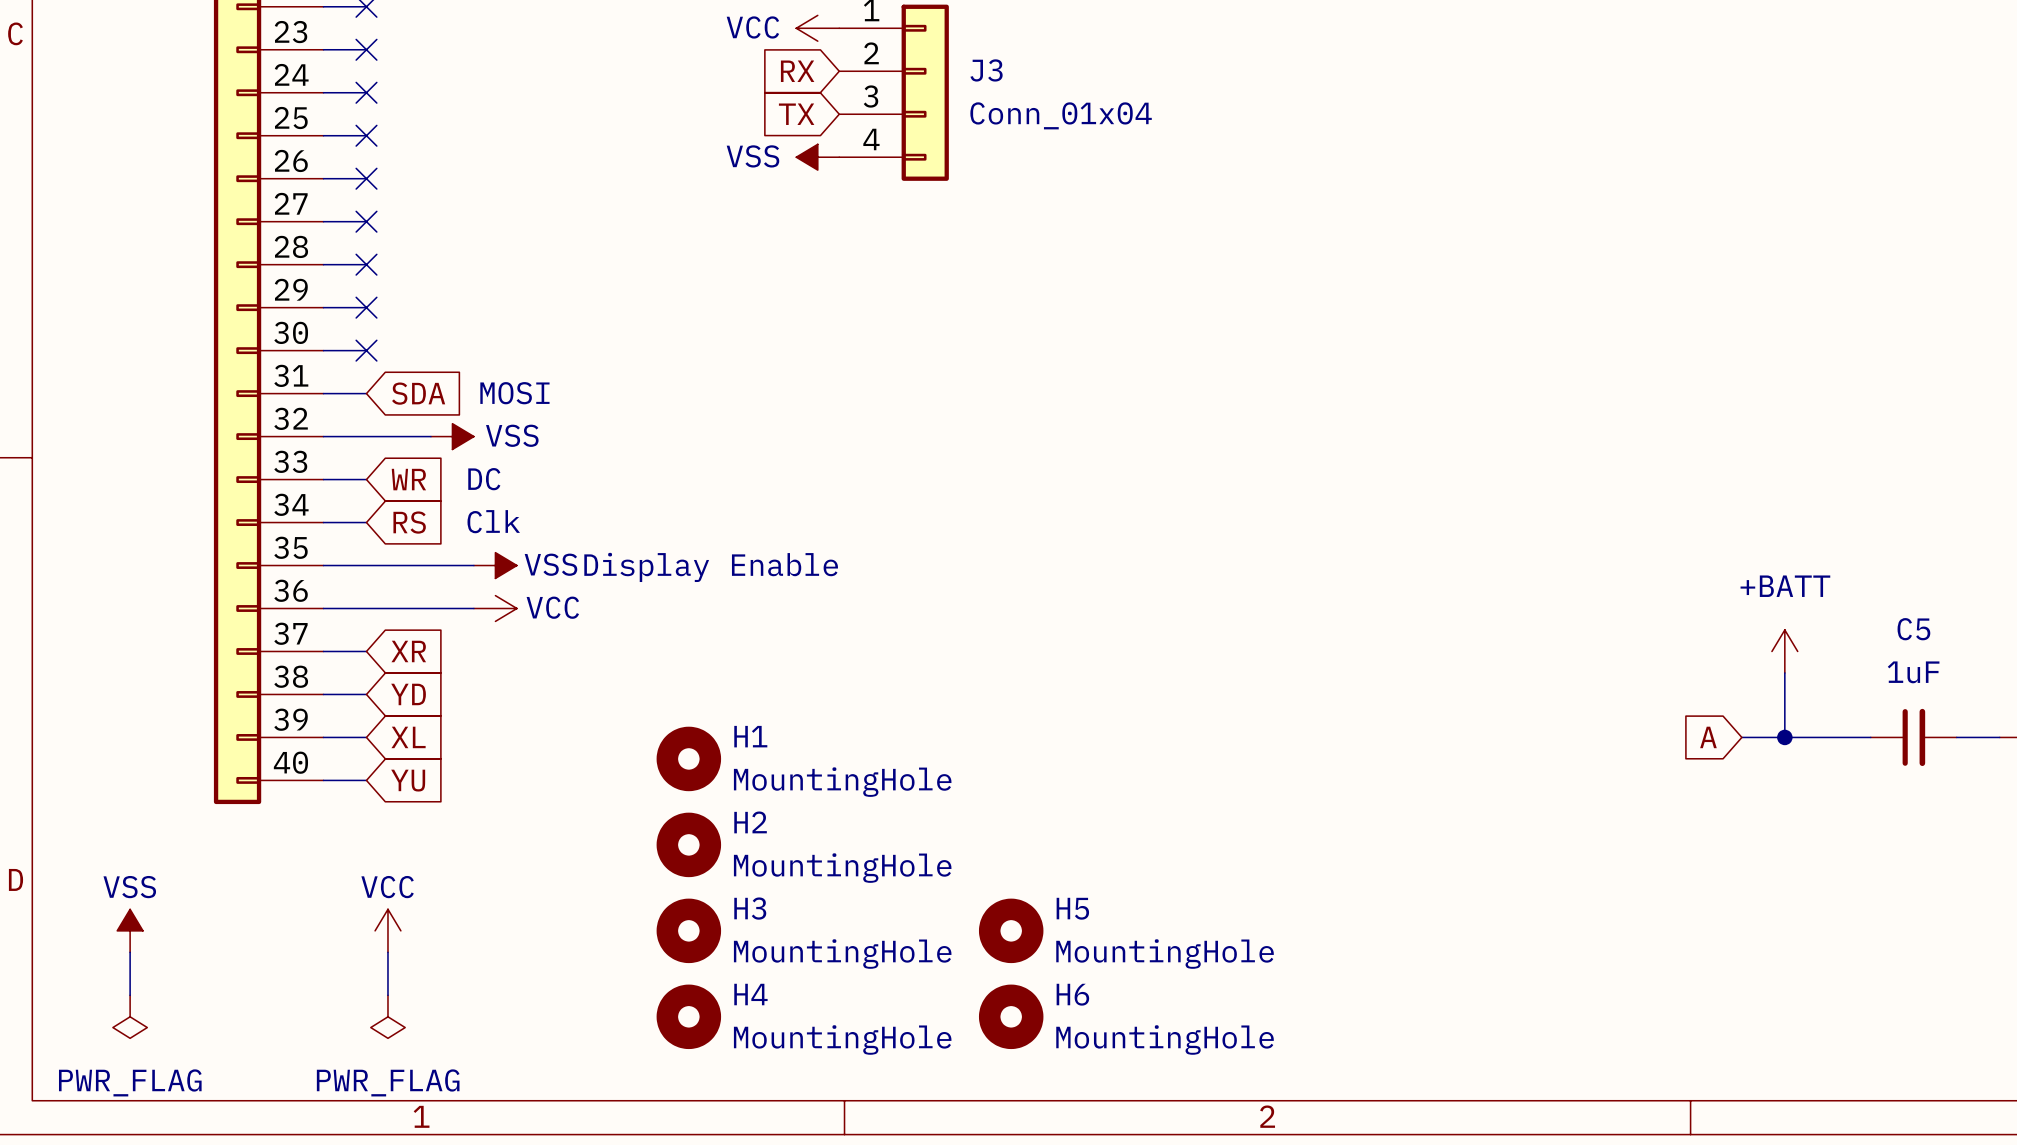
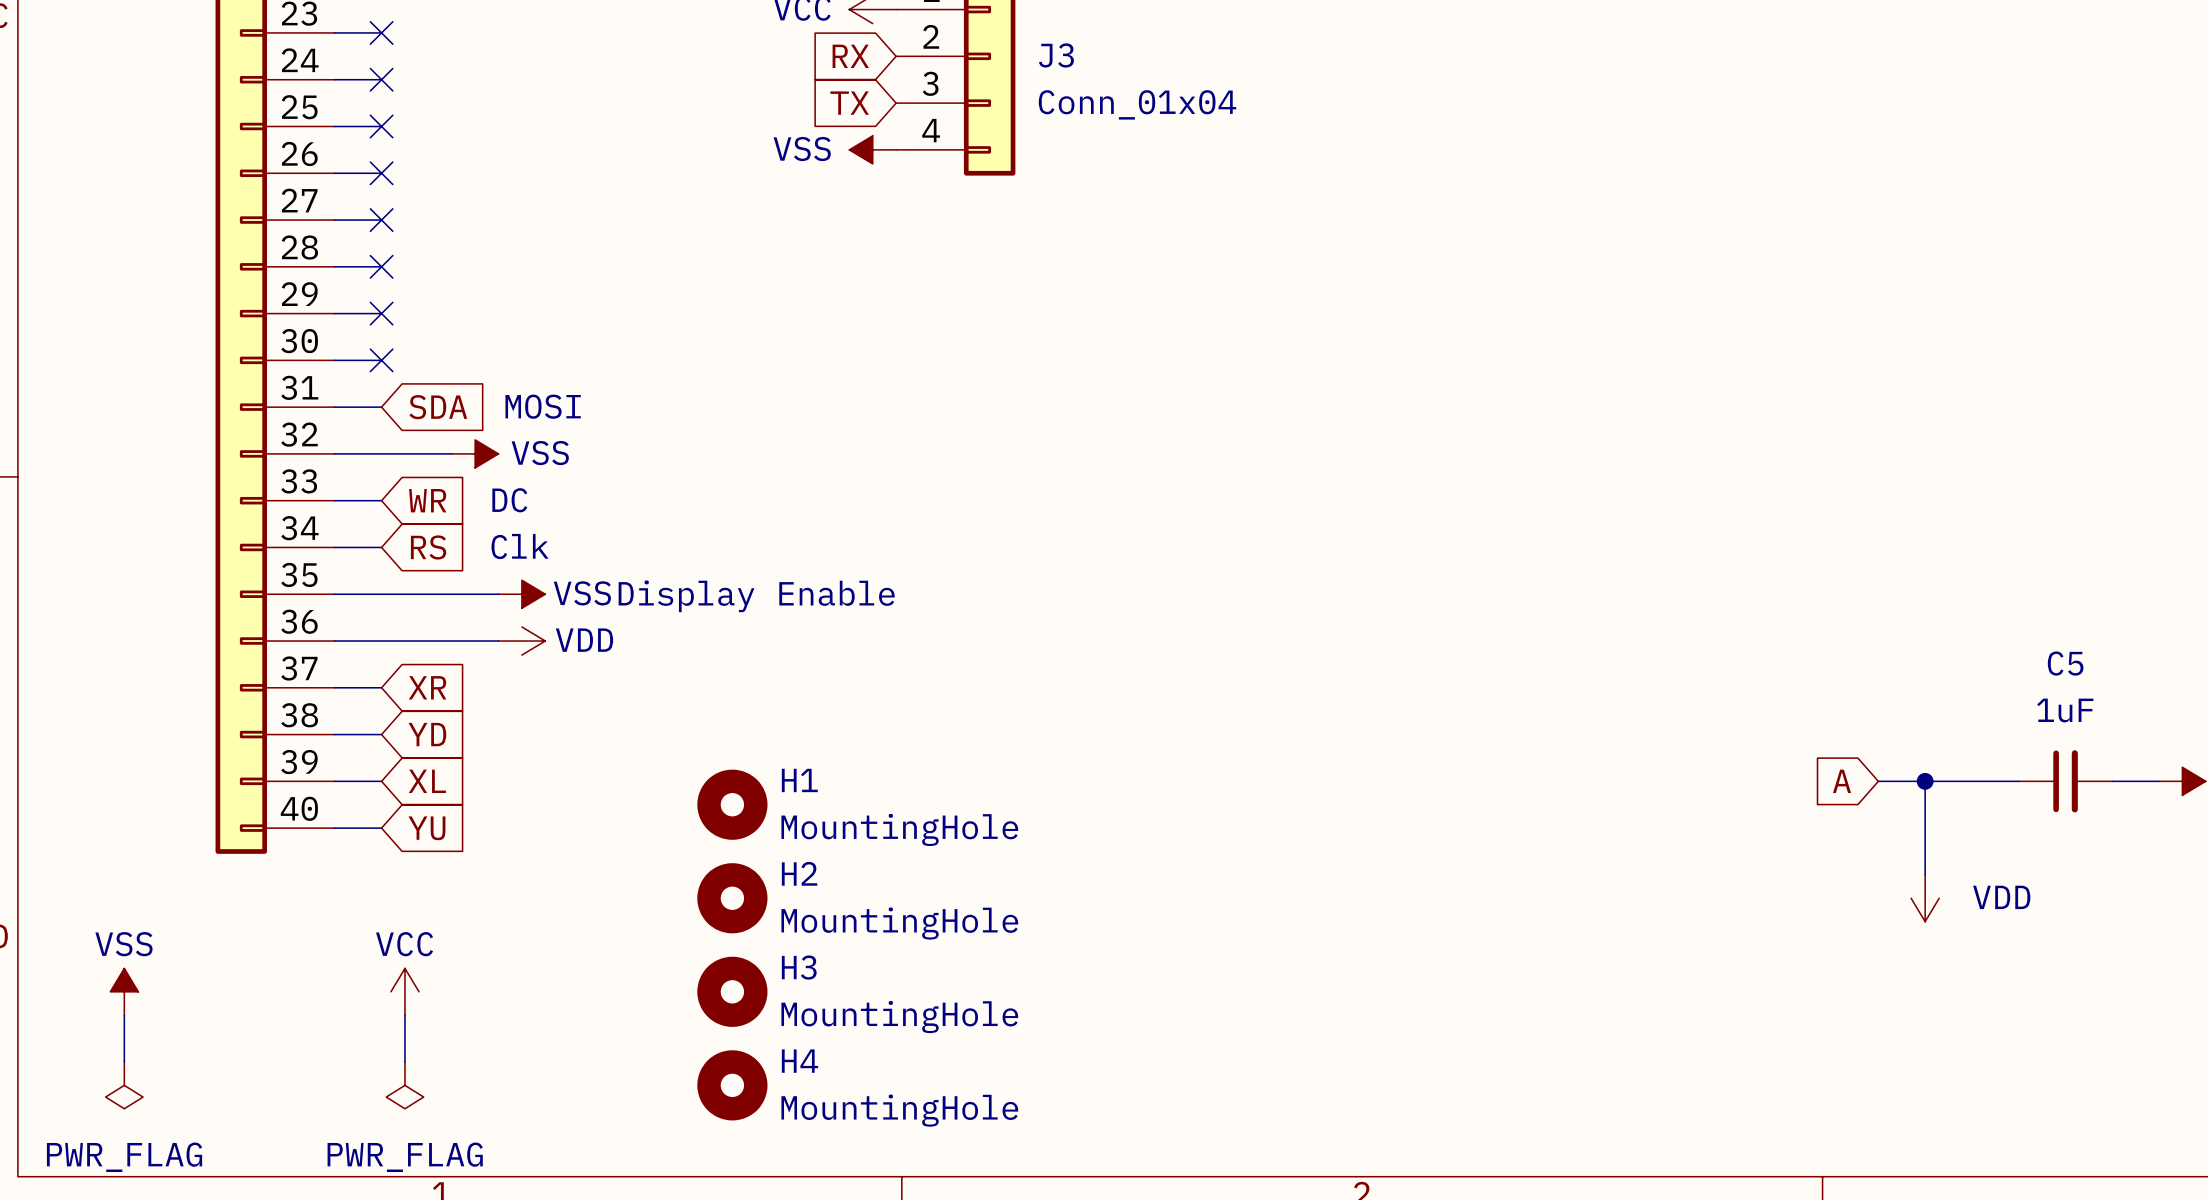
power symbol: VCC (495, 608) -> VDD (521, 641)
power symbol: +BATT (1784, 651) -> none
wire: (1784, 672) (1784, 737) -> (1925, 874) (1925, 781)
power symbol: none -> VDD (1925, 898)
H5: MountingHole (1011, 930) -> none
H6: MountingHole (1011, 1016) -> none

